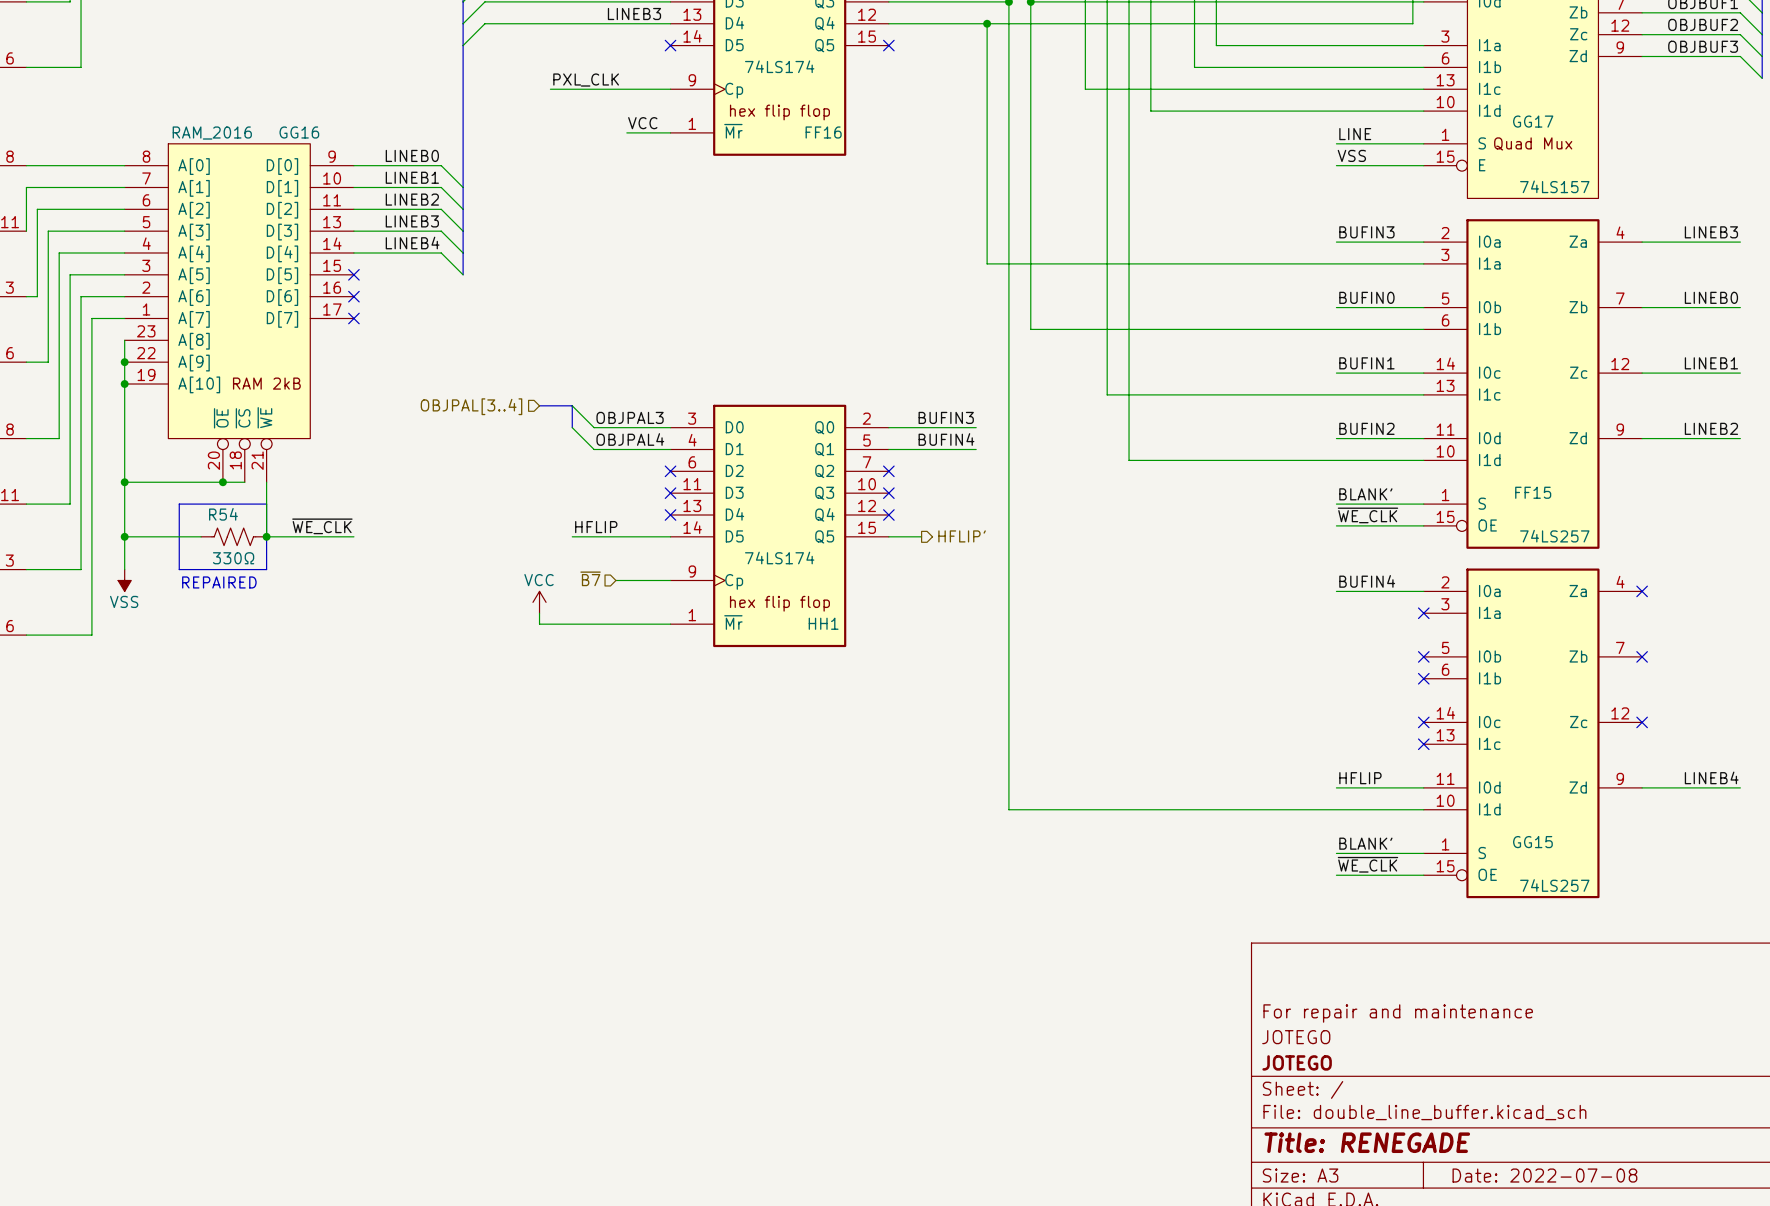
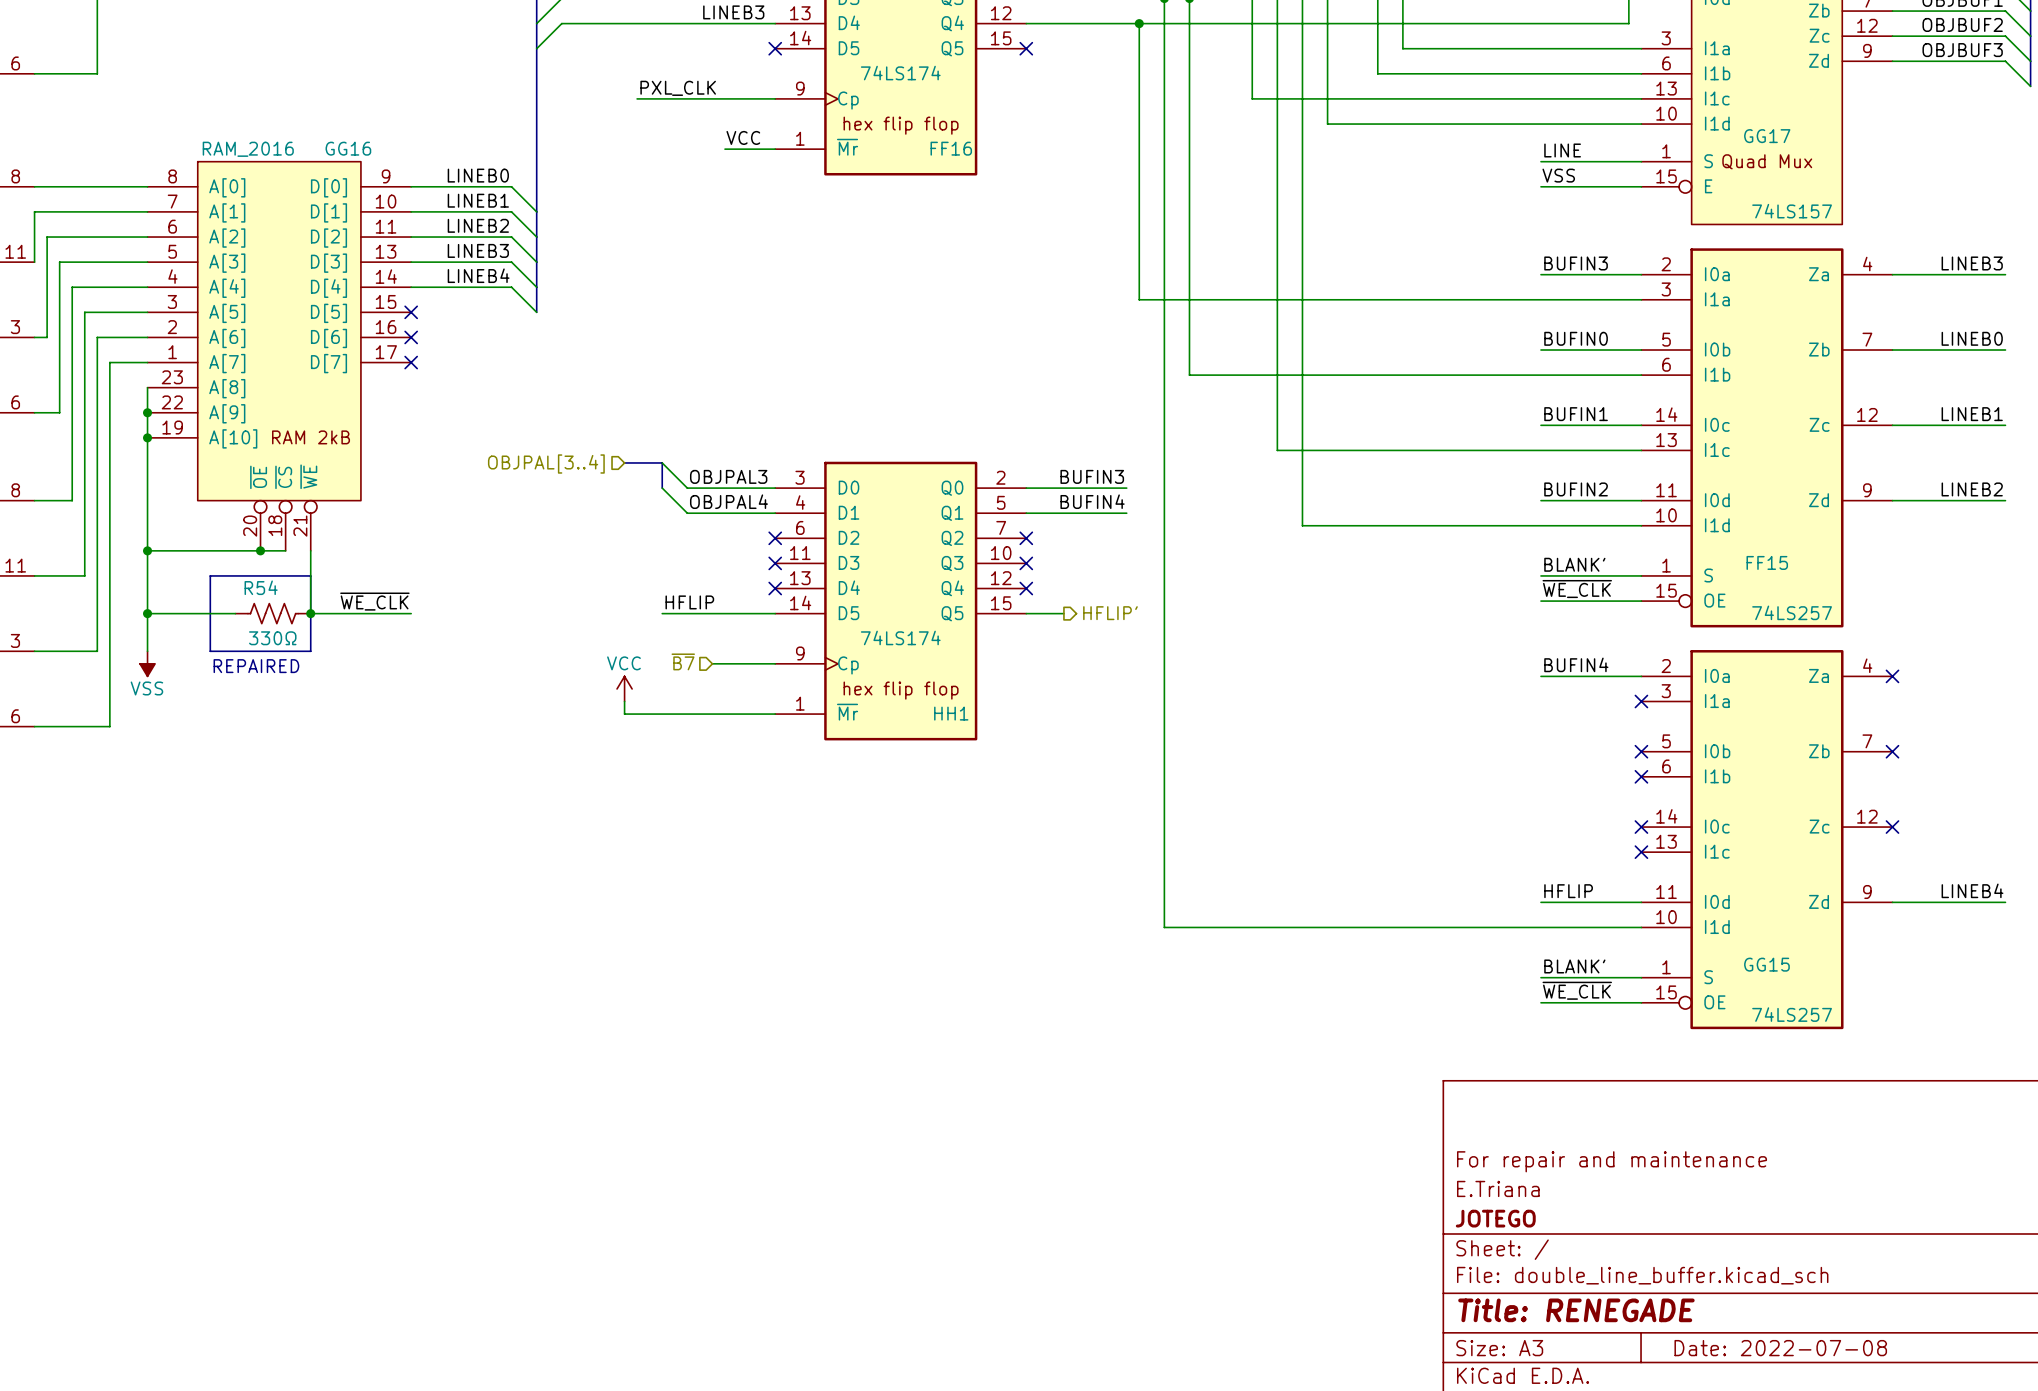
title block: JOTEGO (1296, 1037) -> E.Triana (1498, 1188)

